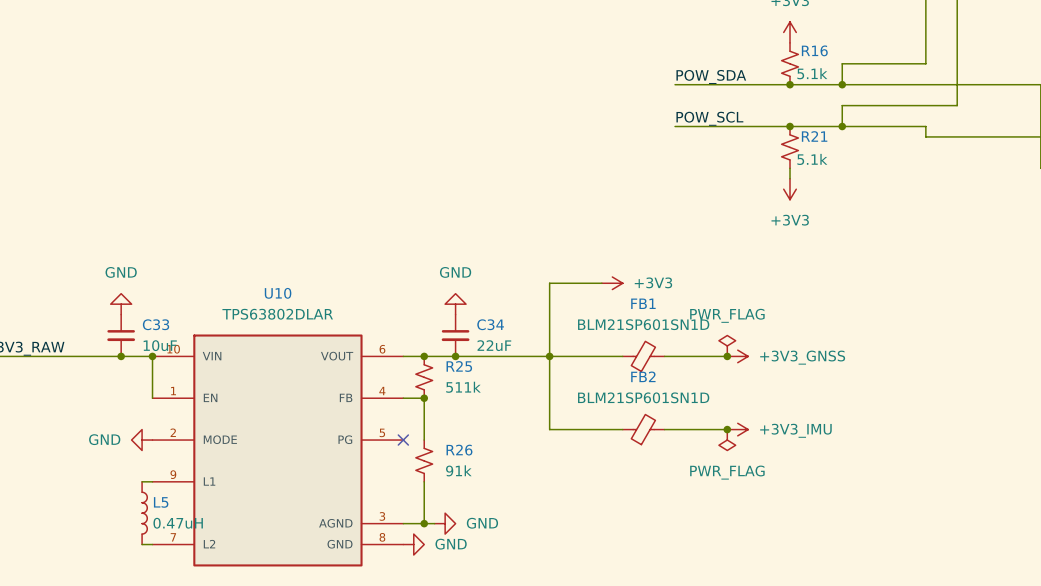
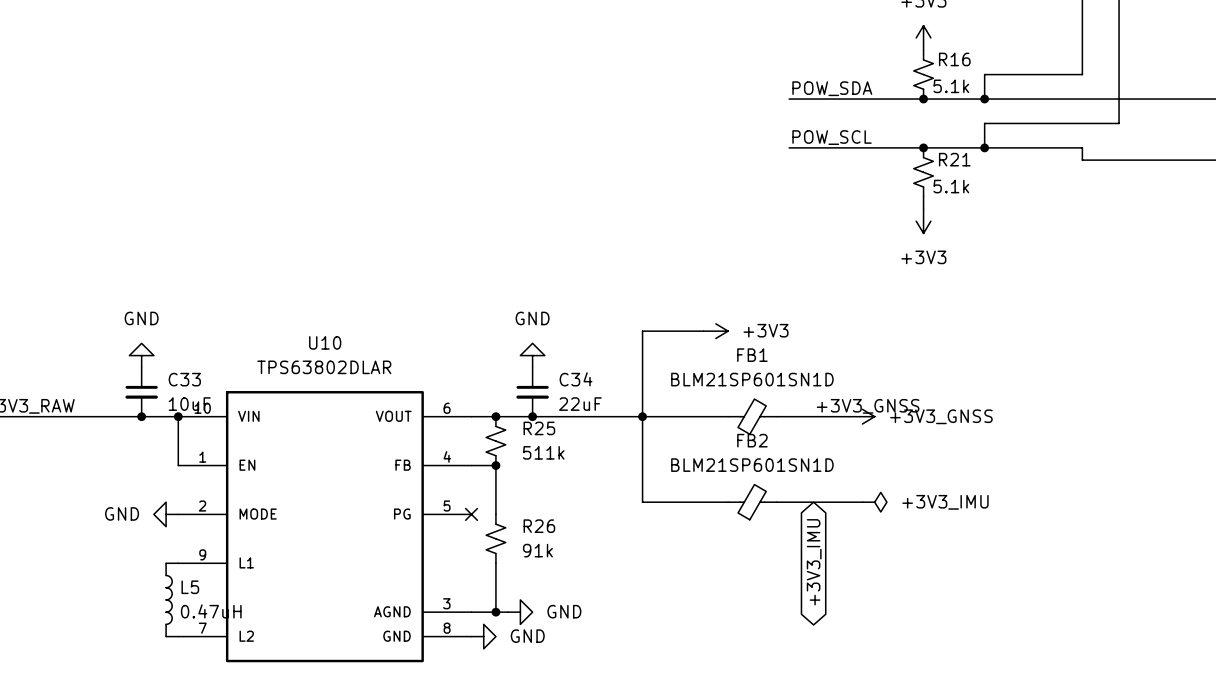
power symbol: PWR_FLAG (727, 345) -> none
label: none -> +3V3_GNSS (868, 406)
junction: (727, 356) -> none
junction: (727, 429) -> none
power symbol: +3V3_IMU (737, 429) -> none
power symbol: none -> +3V3_IMU (874, 502)
power symbol: PWR_FLAG (727, 440) -> none
global label: none -> +3V3_IMU (814, 562)

